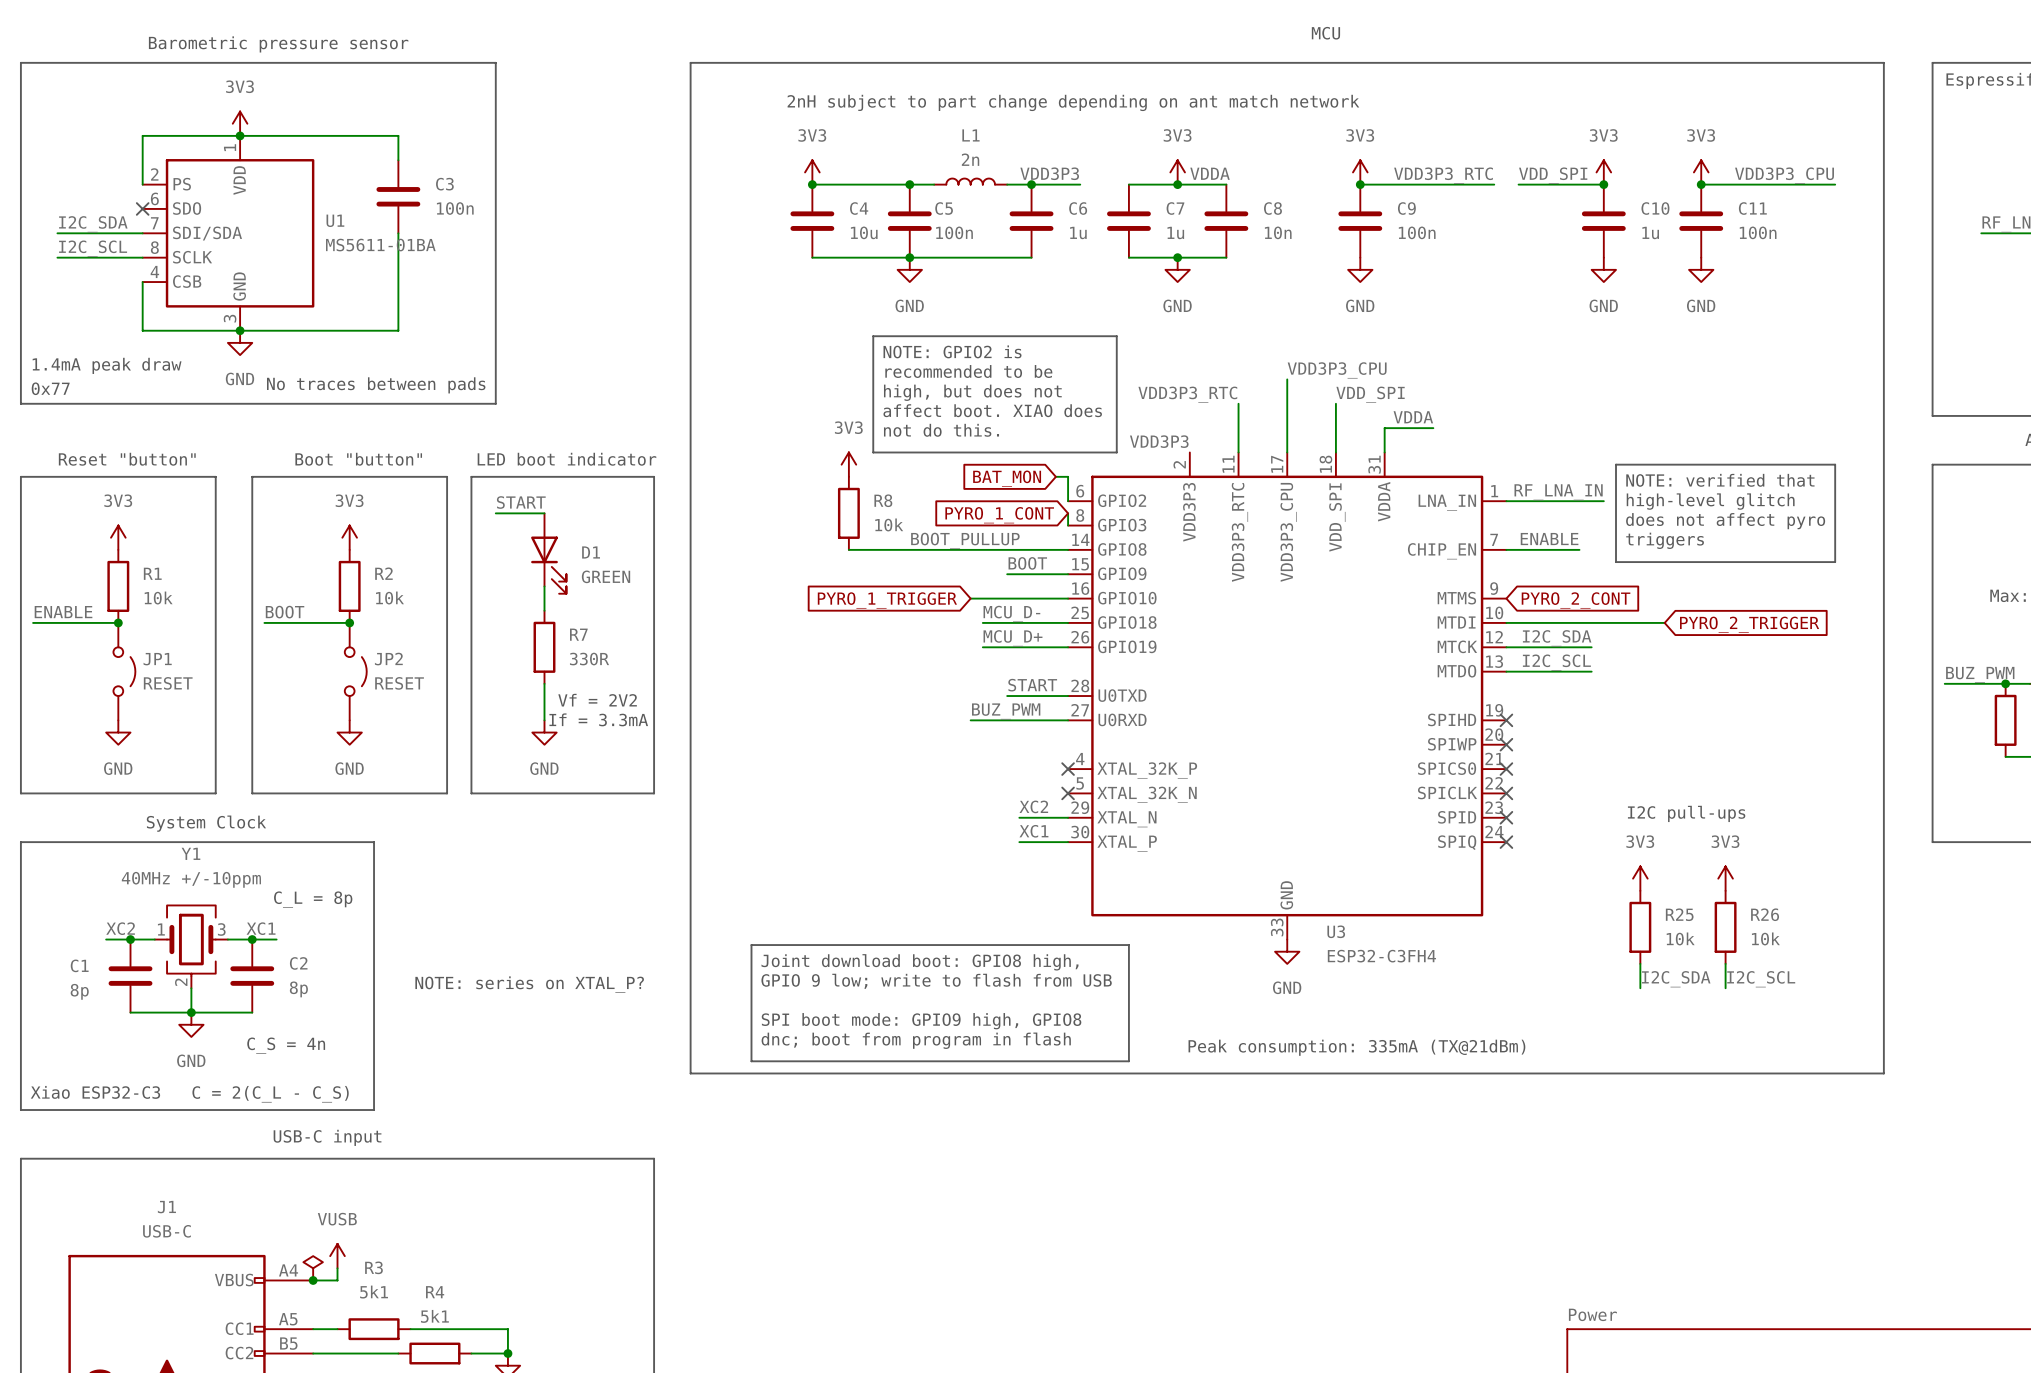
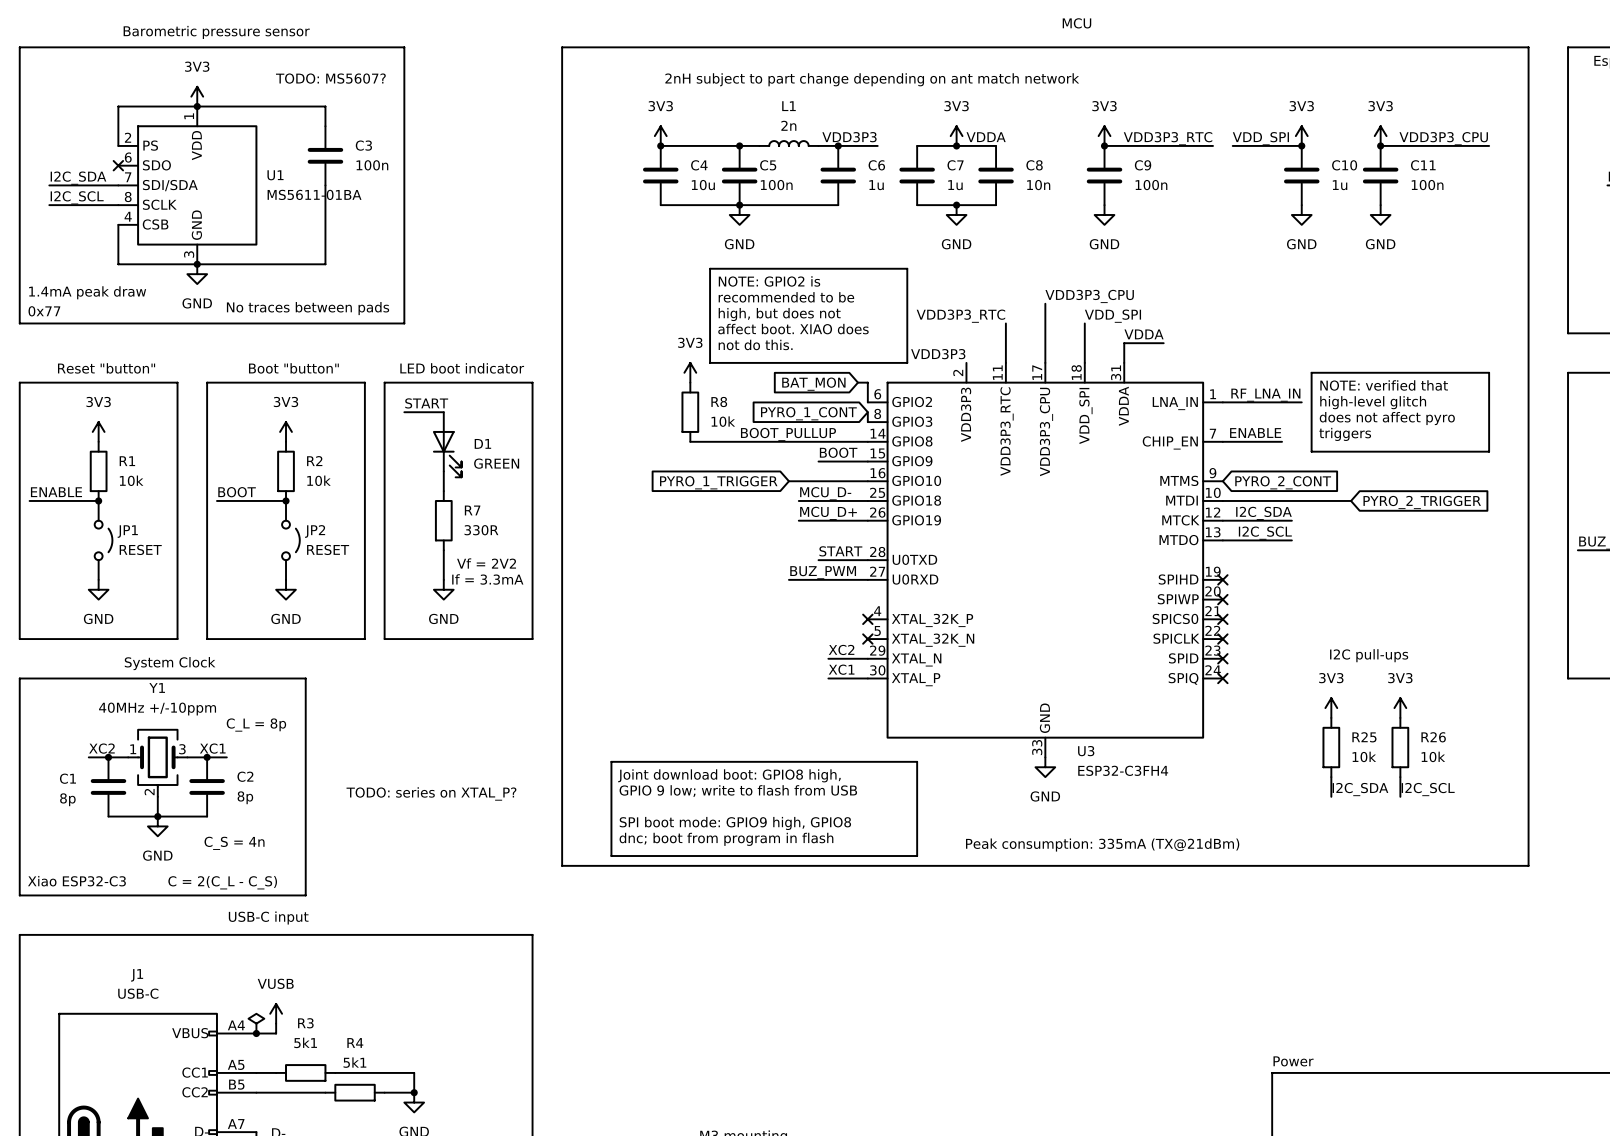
text: none -> TODO: MS5607? (330, 78)
text: NOTE: series on XTAL_P? (529, 984) -> TODO: series on XTAL_P? (431, 793)

